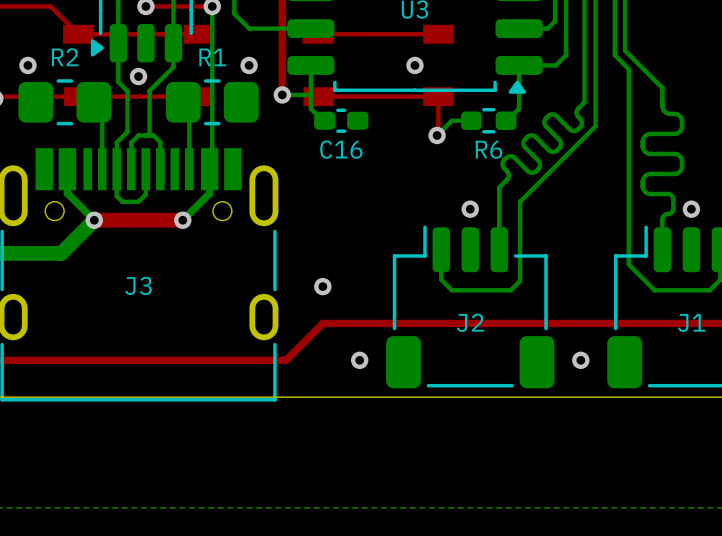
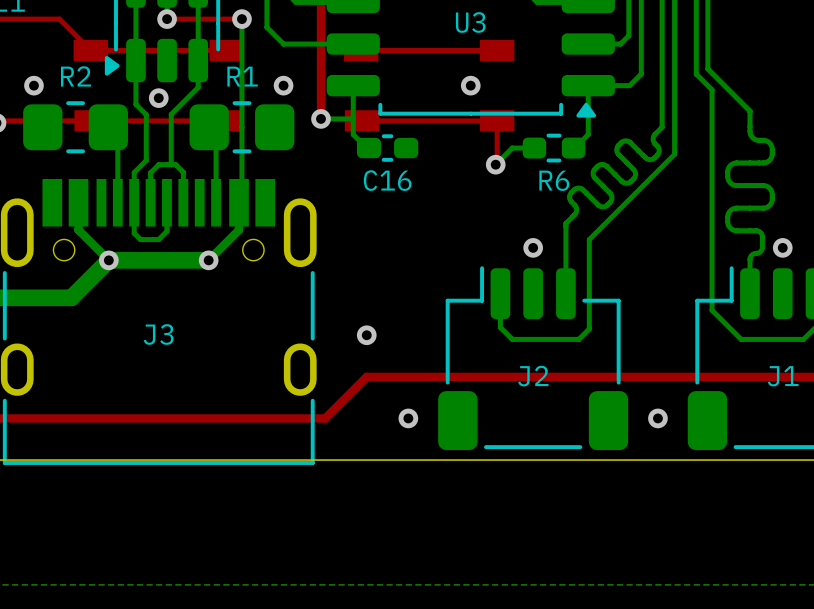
top track: (182, 220) (94, 220) -> none
bottom track: none -> (208, 260) (108, 260)

